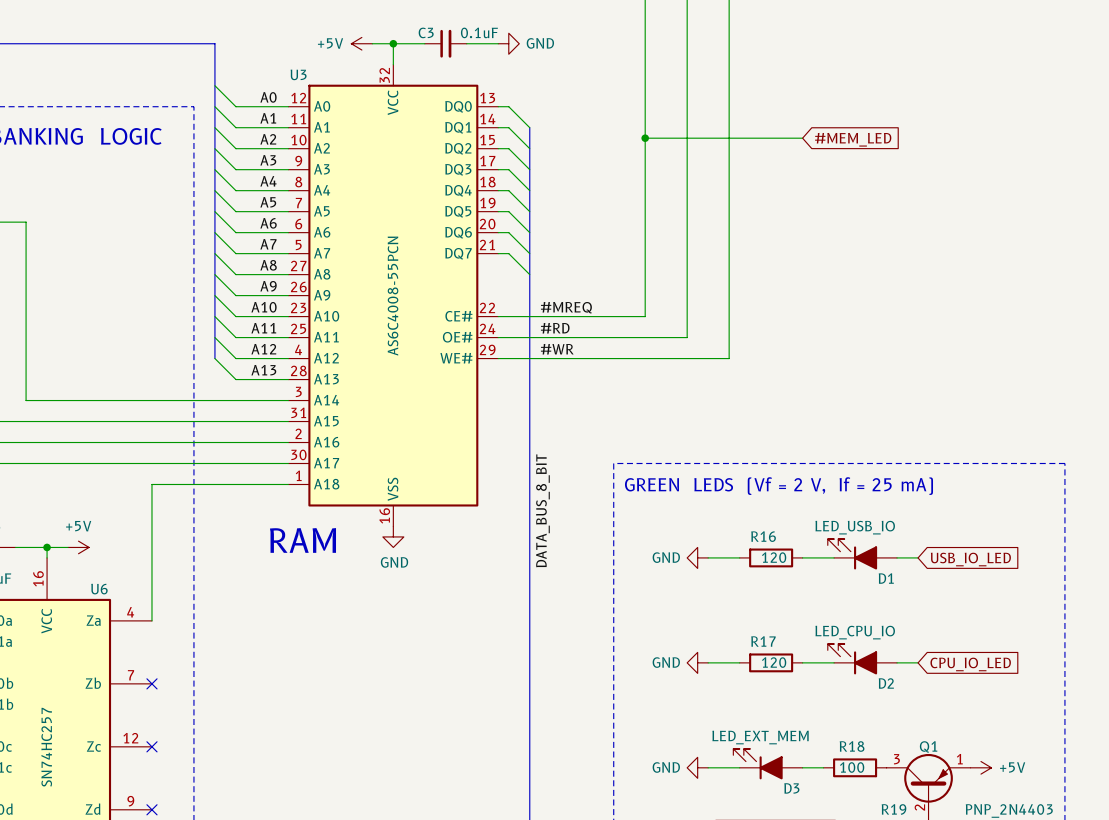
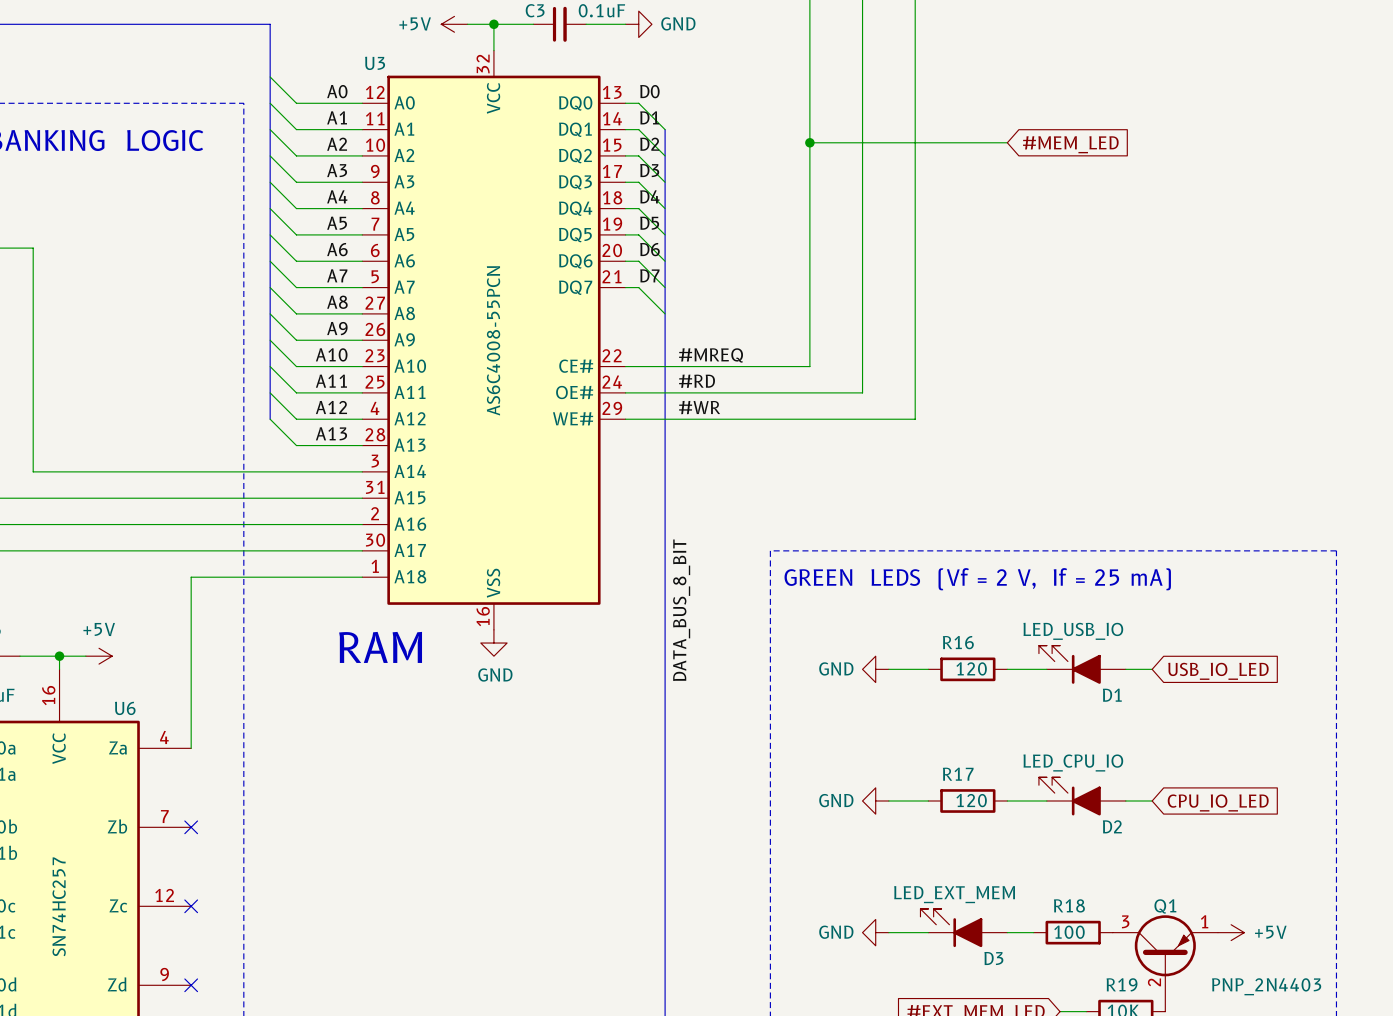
label: none -> D0 (649, 91)
label: none -> D1 (649, 117)
label: none -> D2 (649, 144)
label: none -> D3 (649, 170)
label: none -> D4 (649, 196)
label: none -> D5 (649, 223)
label: none -> D6 (650, 249)
label: none -> D7 (649, 275)

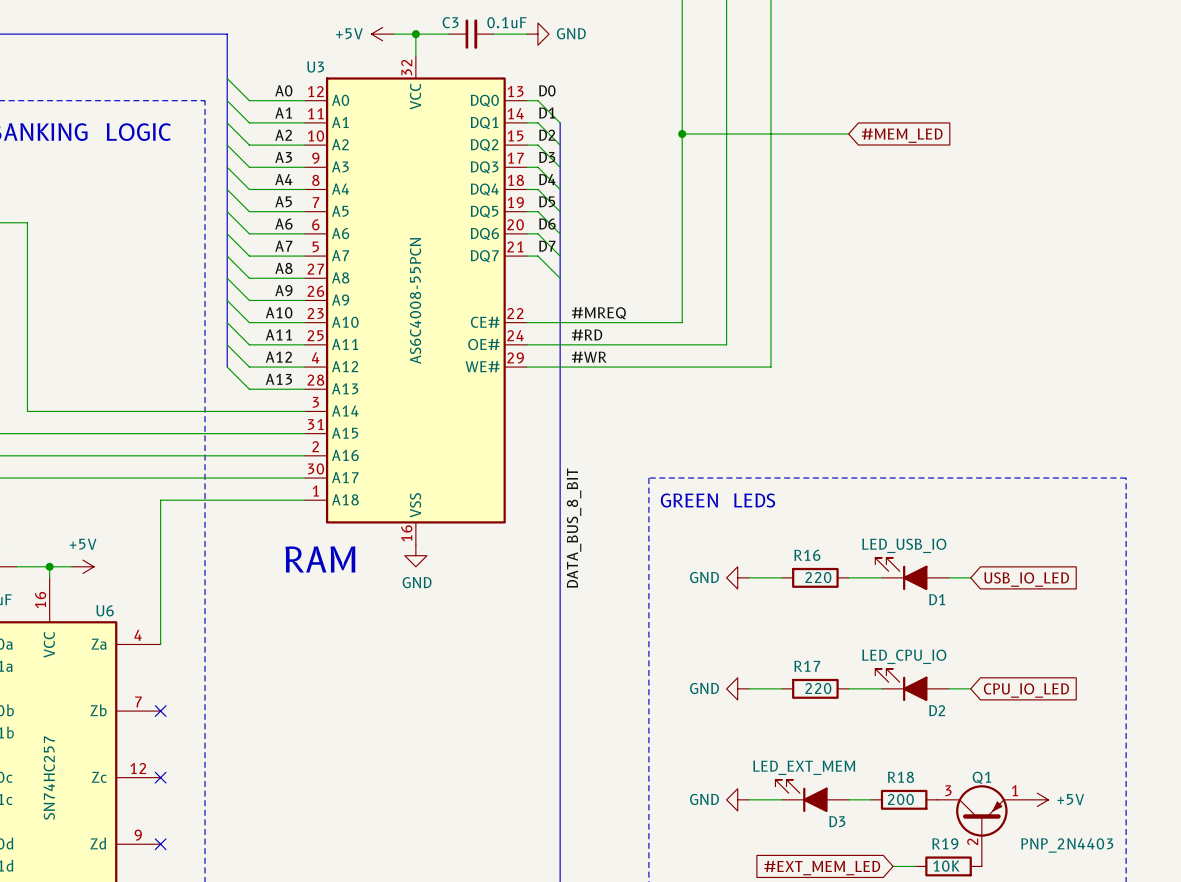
text: GREEN LEDS (Vf = 2 V, If = 25 mA) (977, 579) -> GREEN LEDS (717, 500)
R16 value: 120 (971, 668) -> 220 (818, 577)
R17 value: 120 (971, 800) -> 220 (818, 688)
R18 value: 100 (1069, 932) -> 200 (900, 799)

